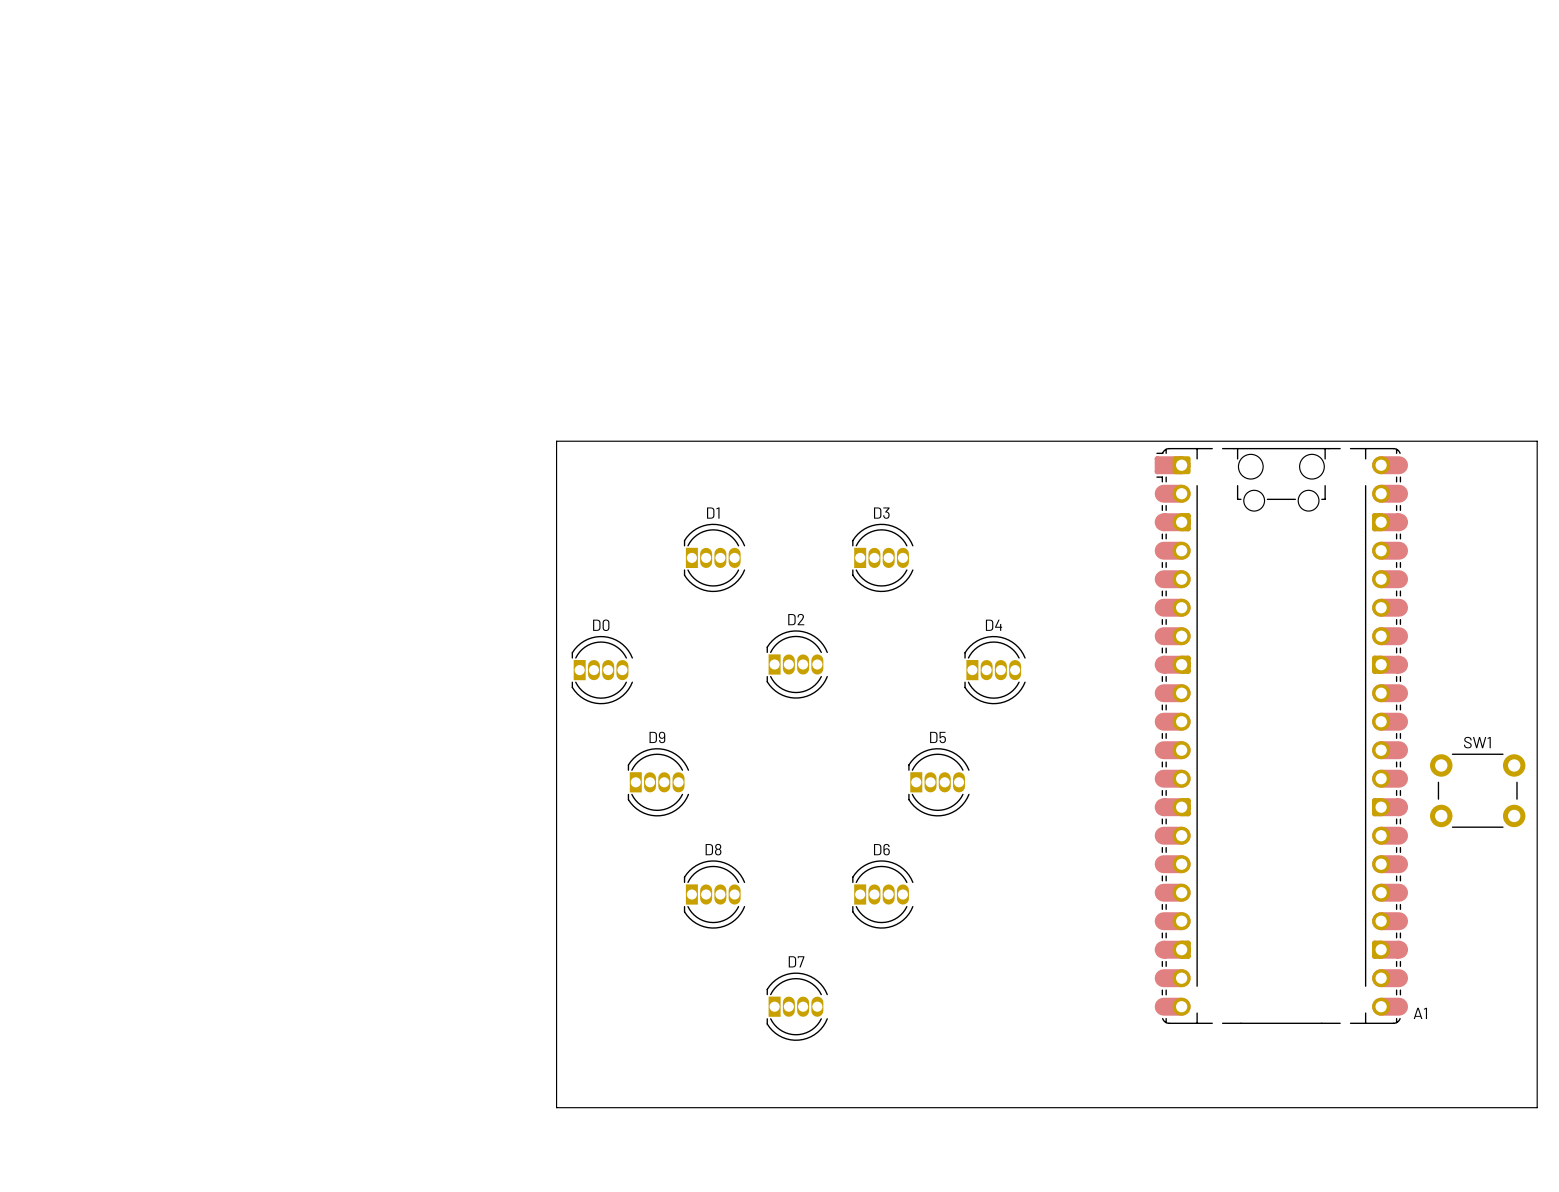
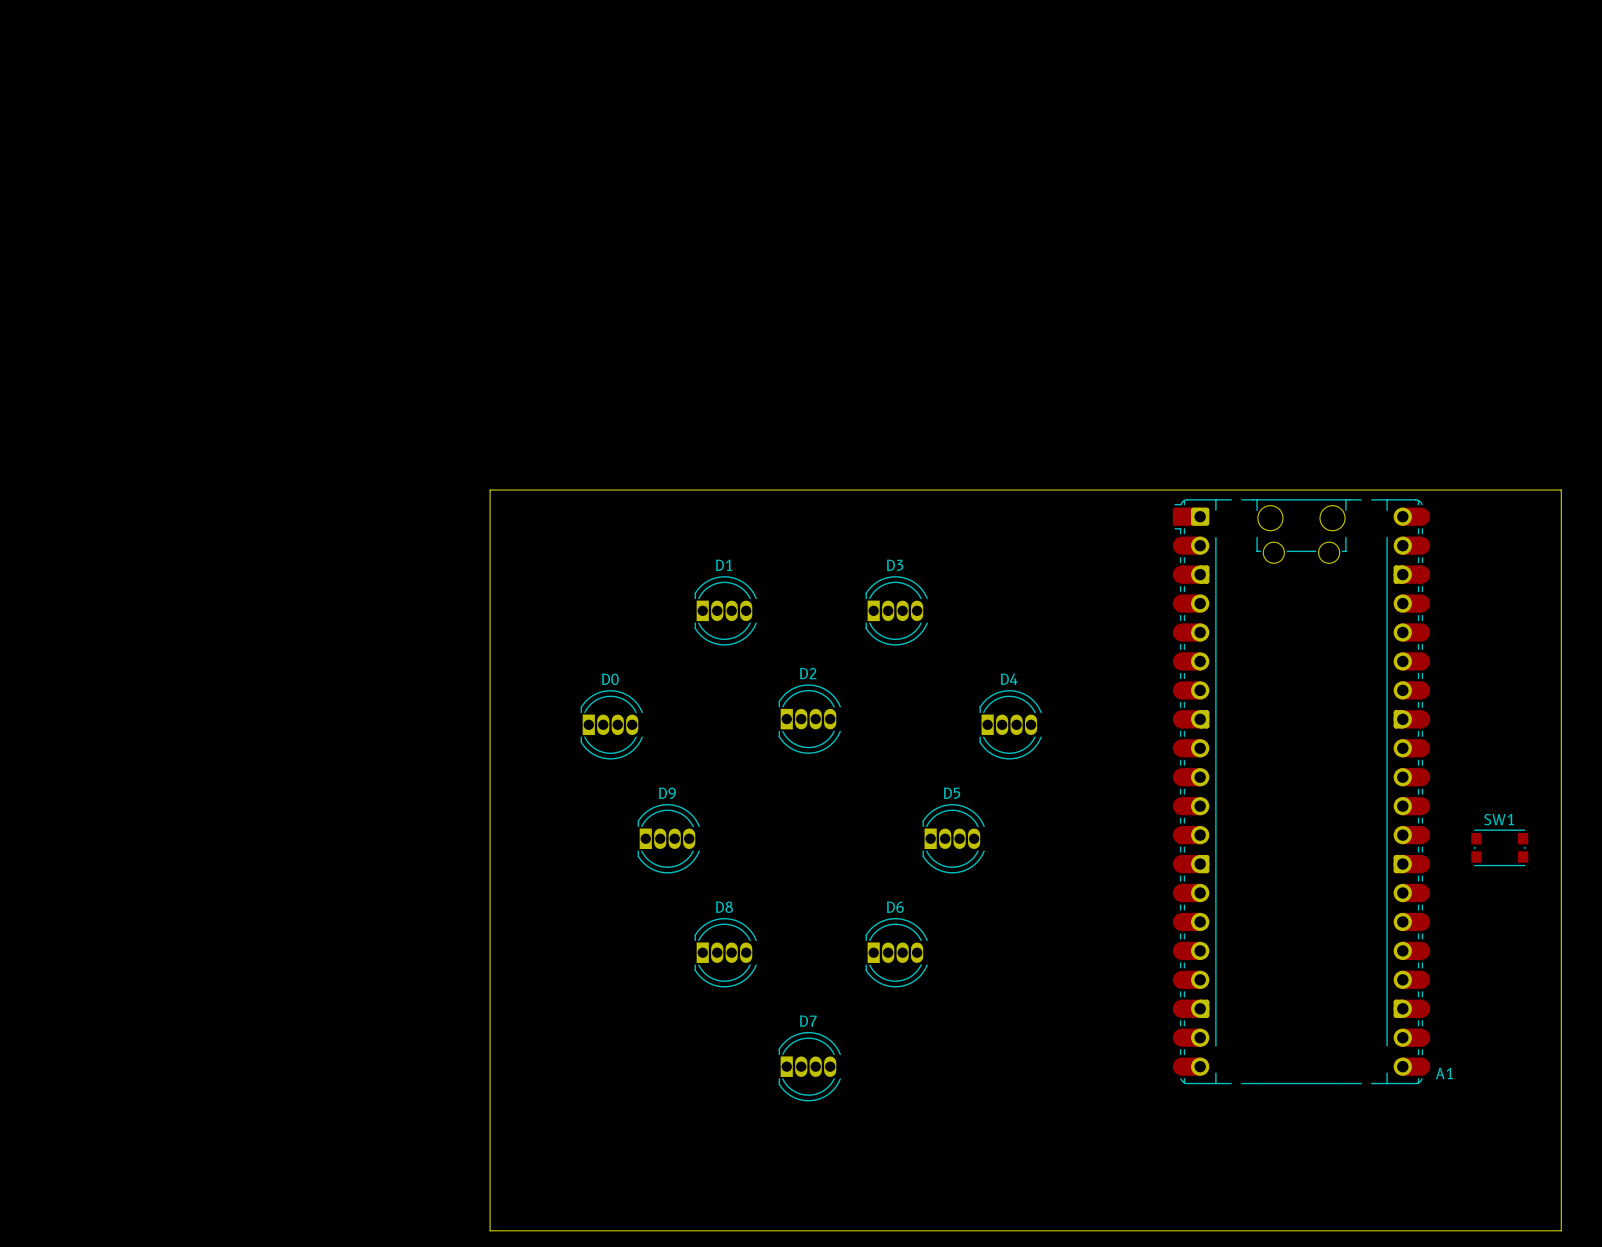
board edge: (1537, 441) (556, 441) (556, 1107) (1537, 1107) -> (1561, 492) (1561, 490) (490, 490) (490, 1230) (1561, 1230) (1561, 1169)
SW1 footprint: [1430, 753, 1526, 828] -> [1471, 829, 1529, 867]

